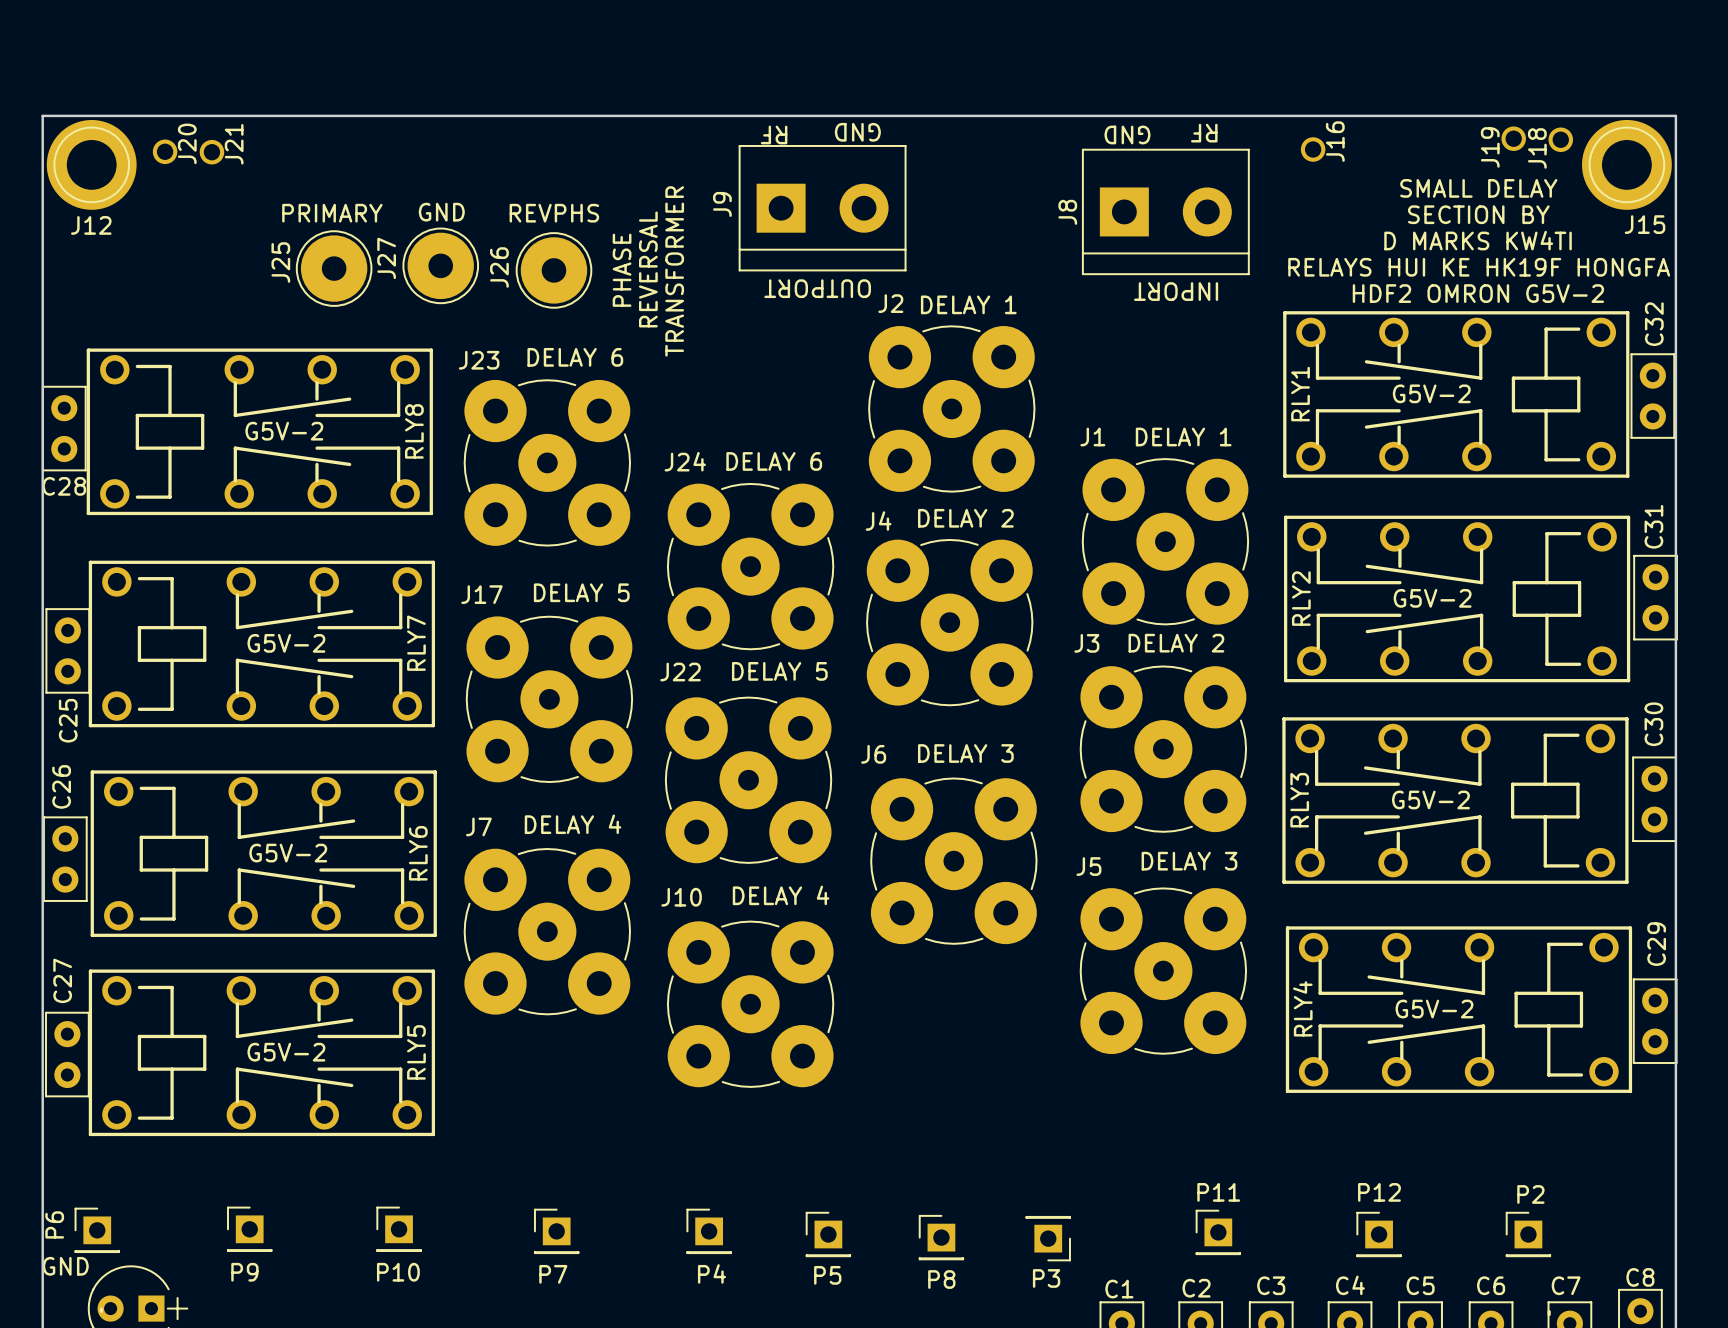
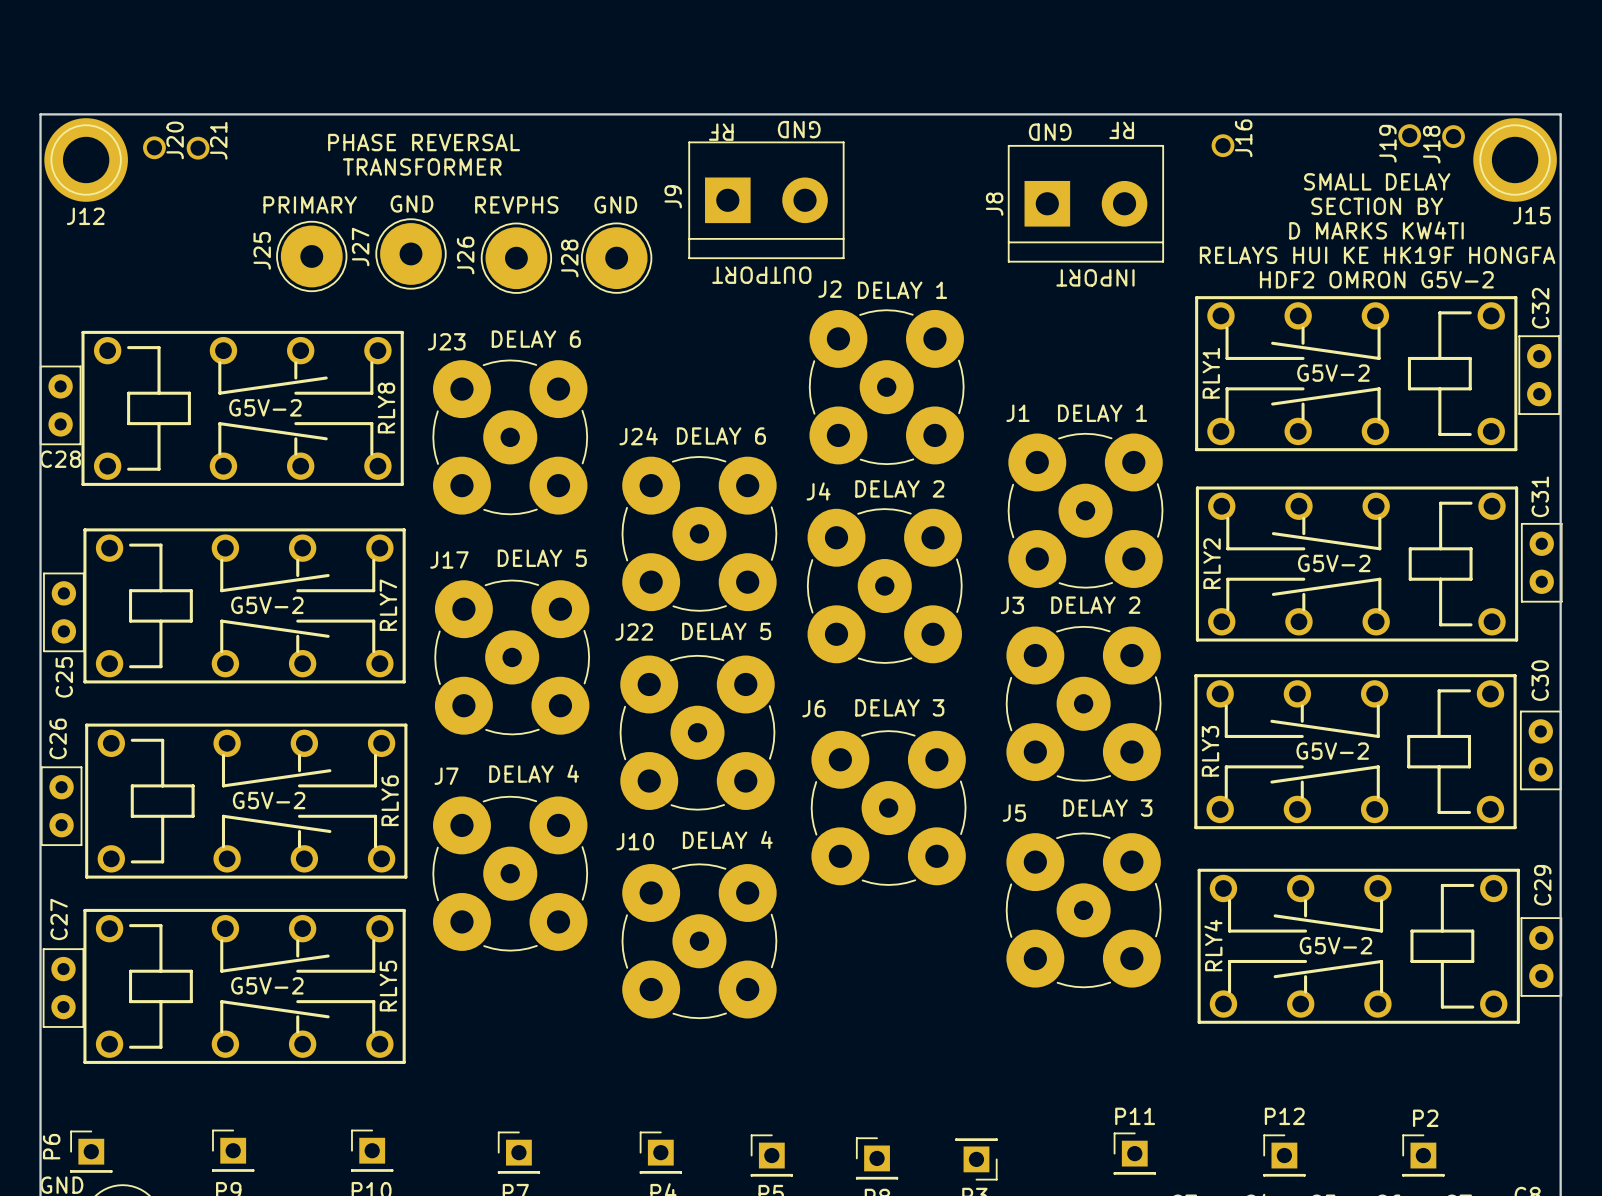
text: none -> PHASE REVERSAL (424, 142)
text: none -> GND (615, 204)
text: REVERSAL (648, 269) -> none
text: PHASE (622, 270) -> none
J28: none -> (616, 258)
text rotation: 0° (674, 271) -> 90° clockwise (422, 167)
text position: TRANSFORMER (674, 271) -> TRANSFORMER (422, 167)

